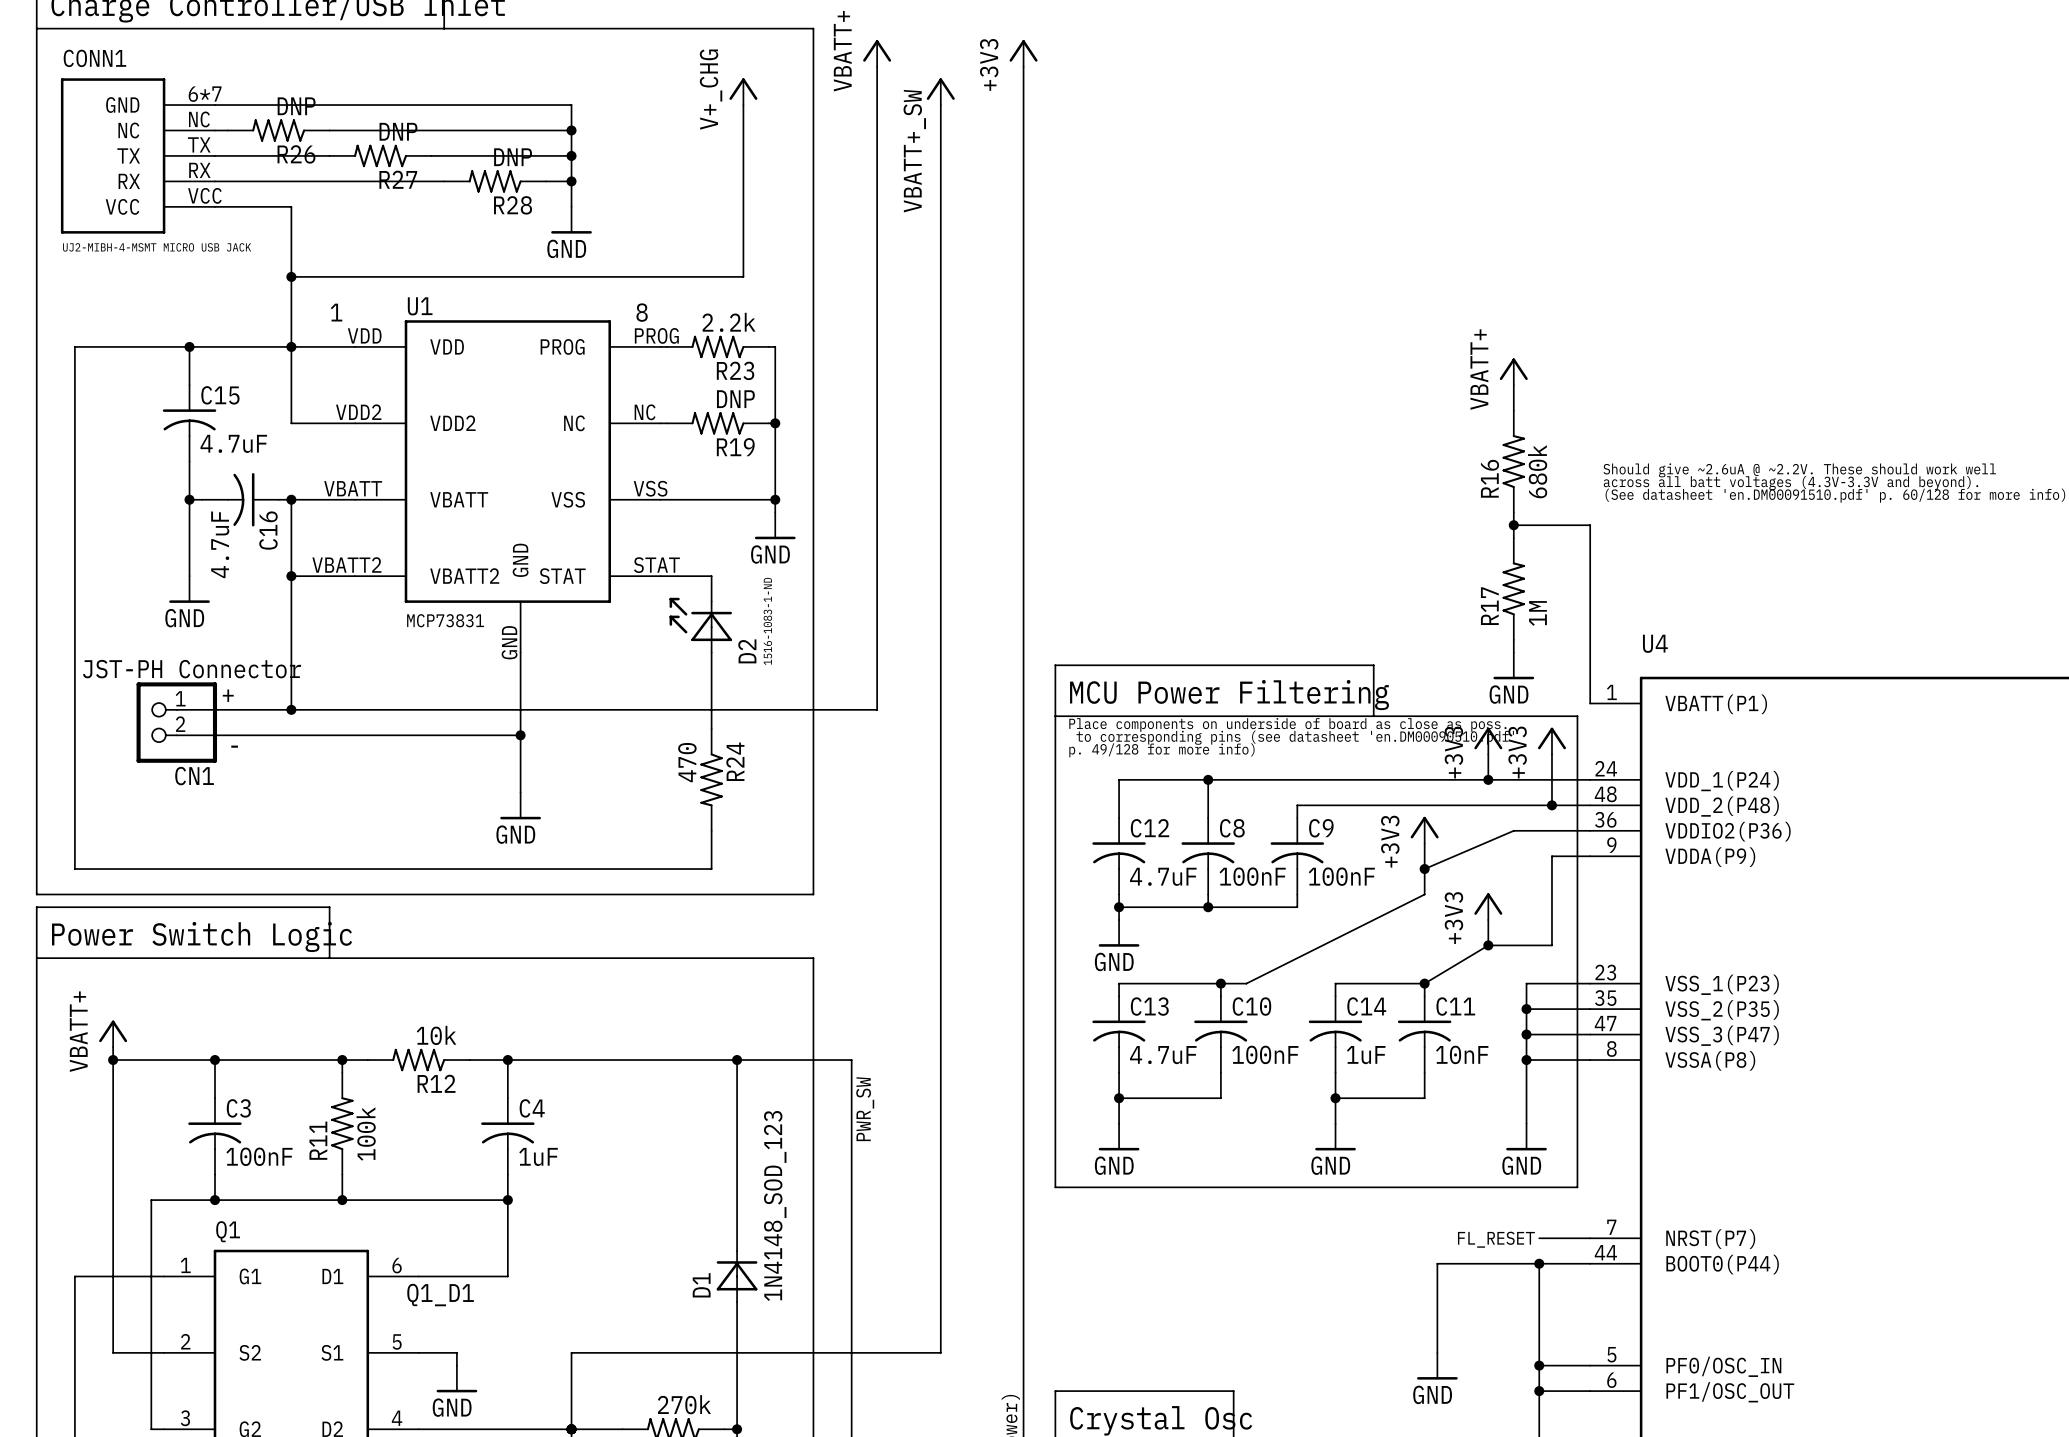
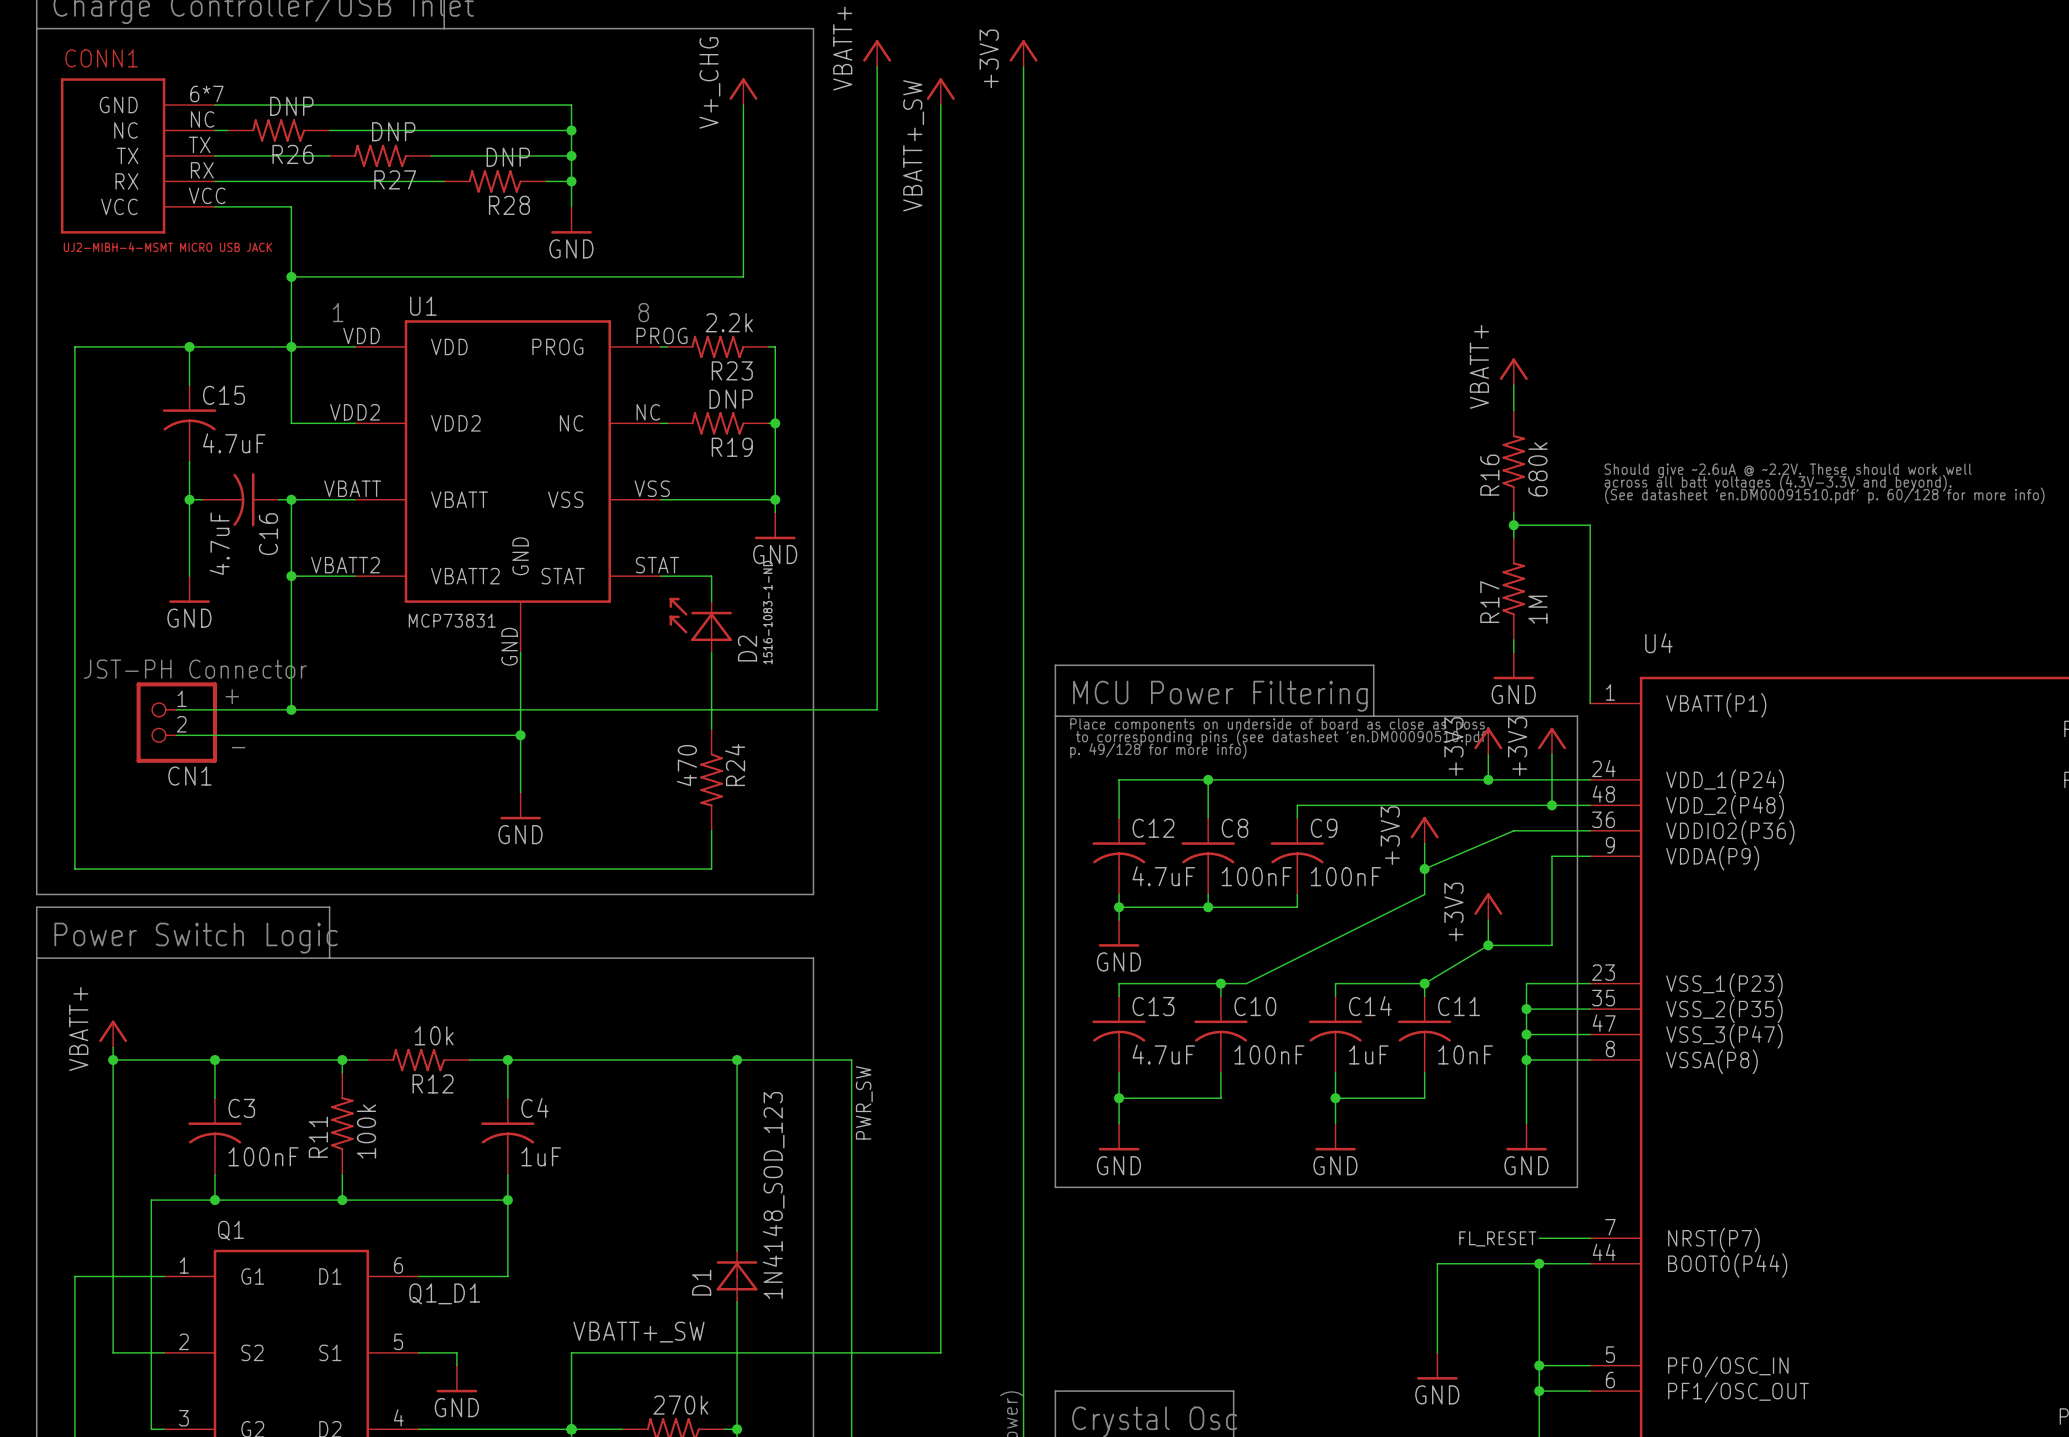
label: none -> VBATT+_SW (638, 1332)

